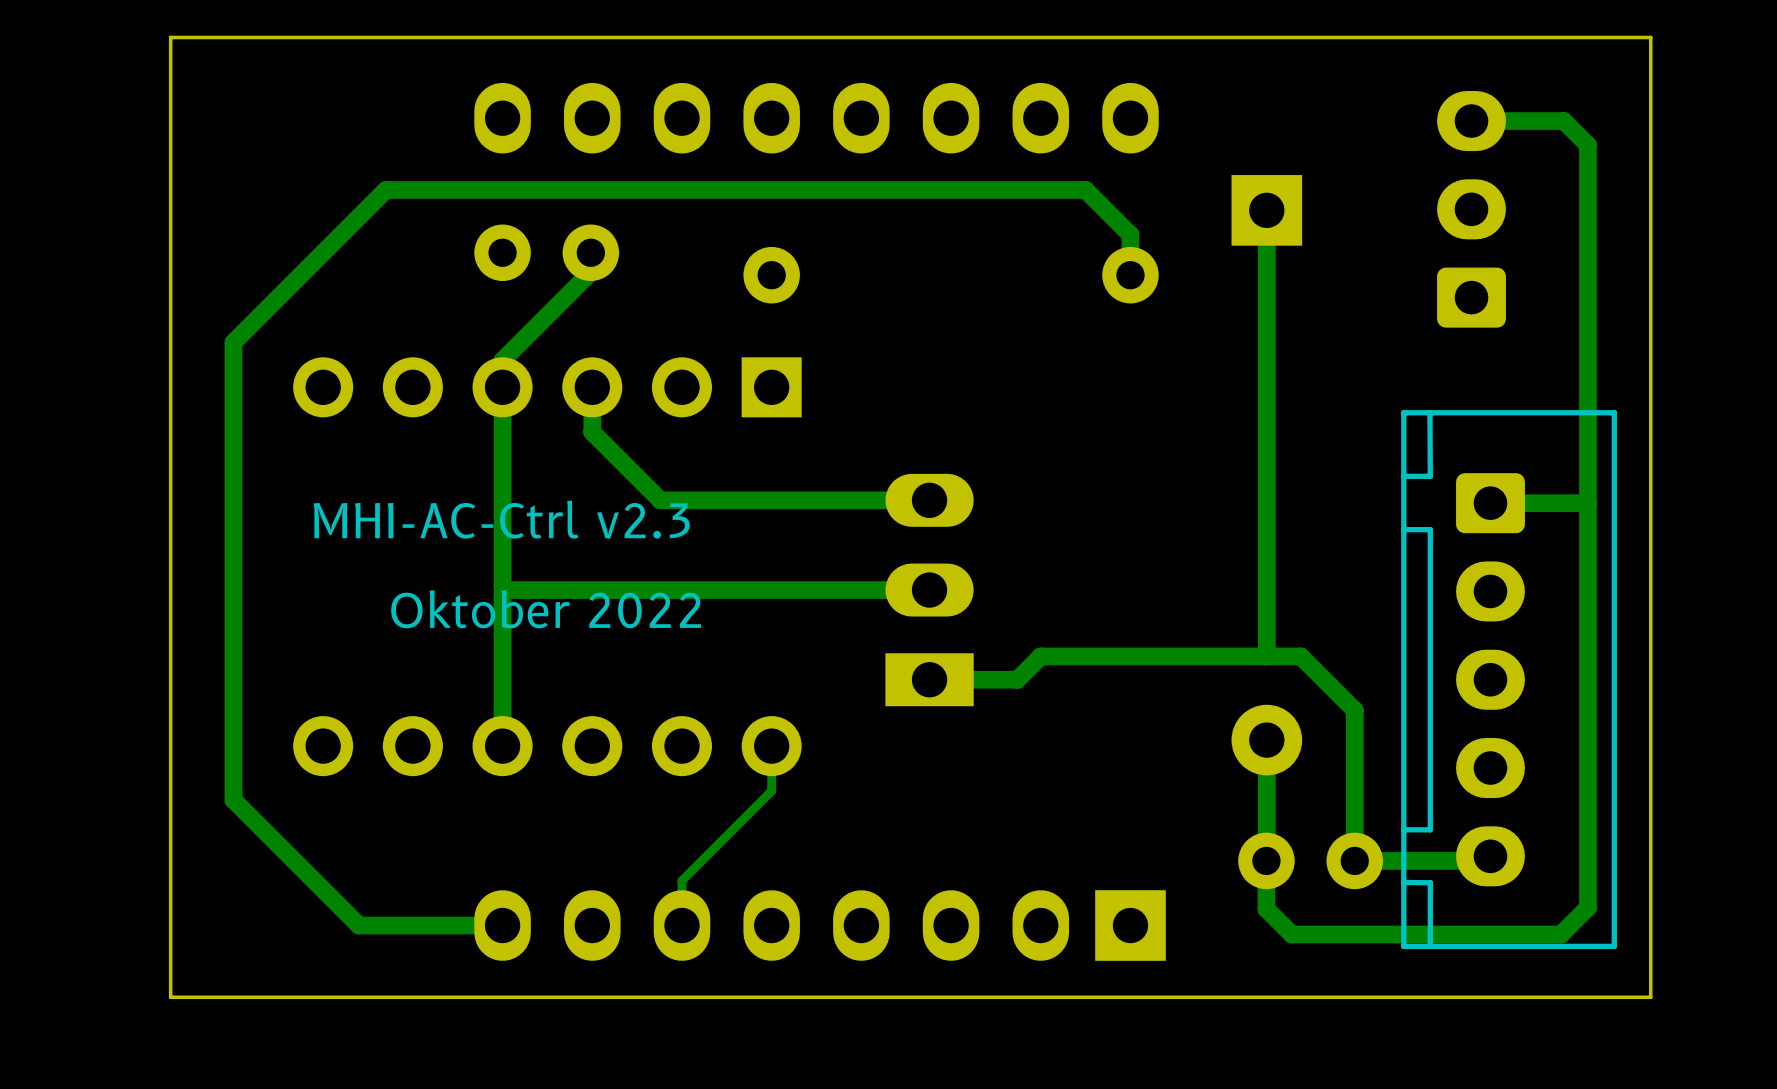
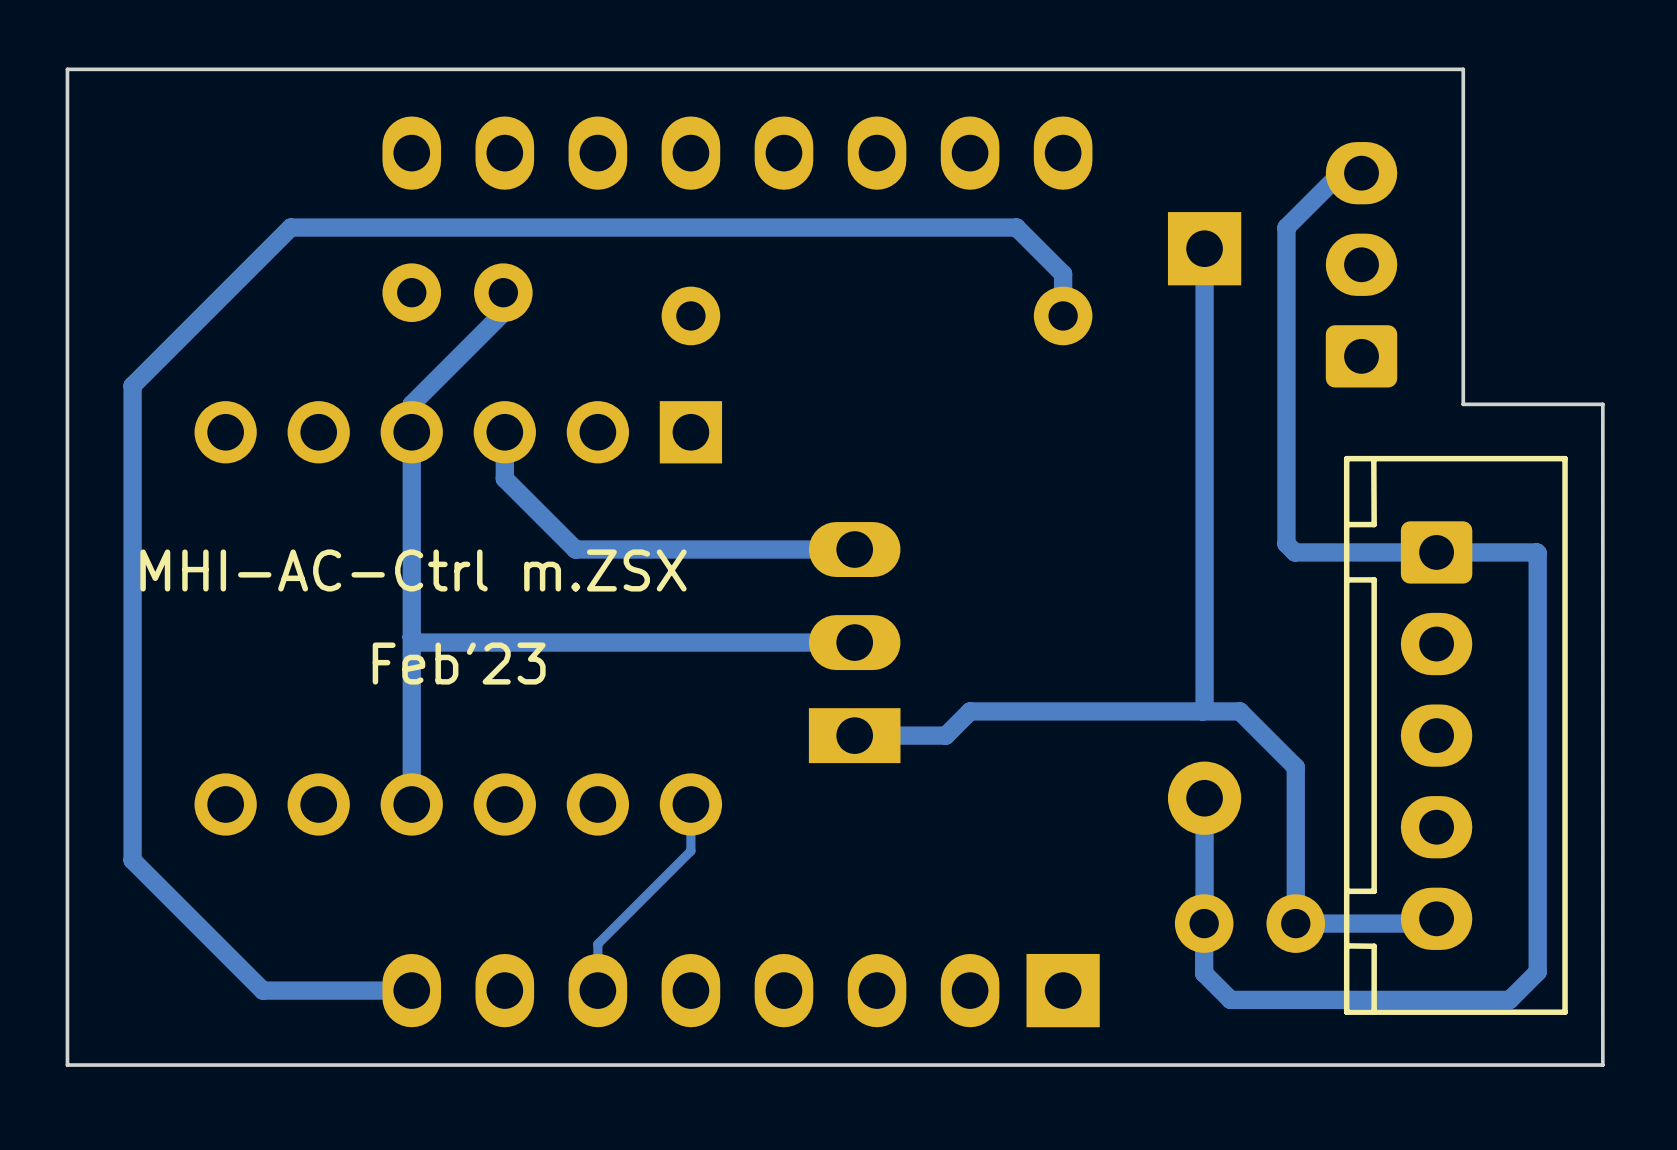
board edge: (1516, 37) (1650, 37) (1650, 360) -> (1463, 69) (1463, 404) (1602, 404)
track: (1471, 121) (1563, 121) (1587, 145) (1587, 503) -> none
track: none -> (1361, 173) (1340, 173) (1286, 227) (1286, 543) (1294, 552) (1436, 552)
part position: (1471, 209) -> (1361, 264)
text: MHI-AC-Ctrl v2.3 (501, 519) -> MHI-AC-Ctrl m.ZSX (413, 570)
text: Oktober 2022 (546, 609) -> Feb'23 (459, 663)

